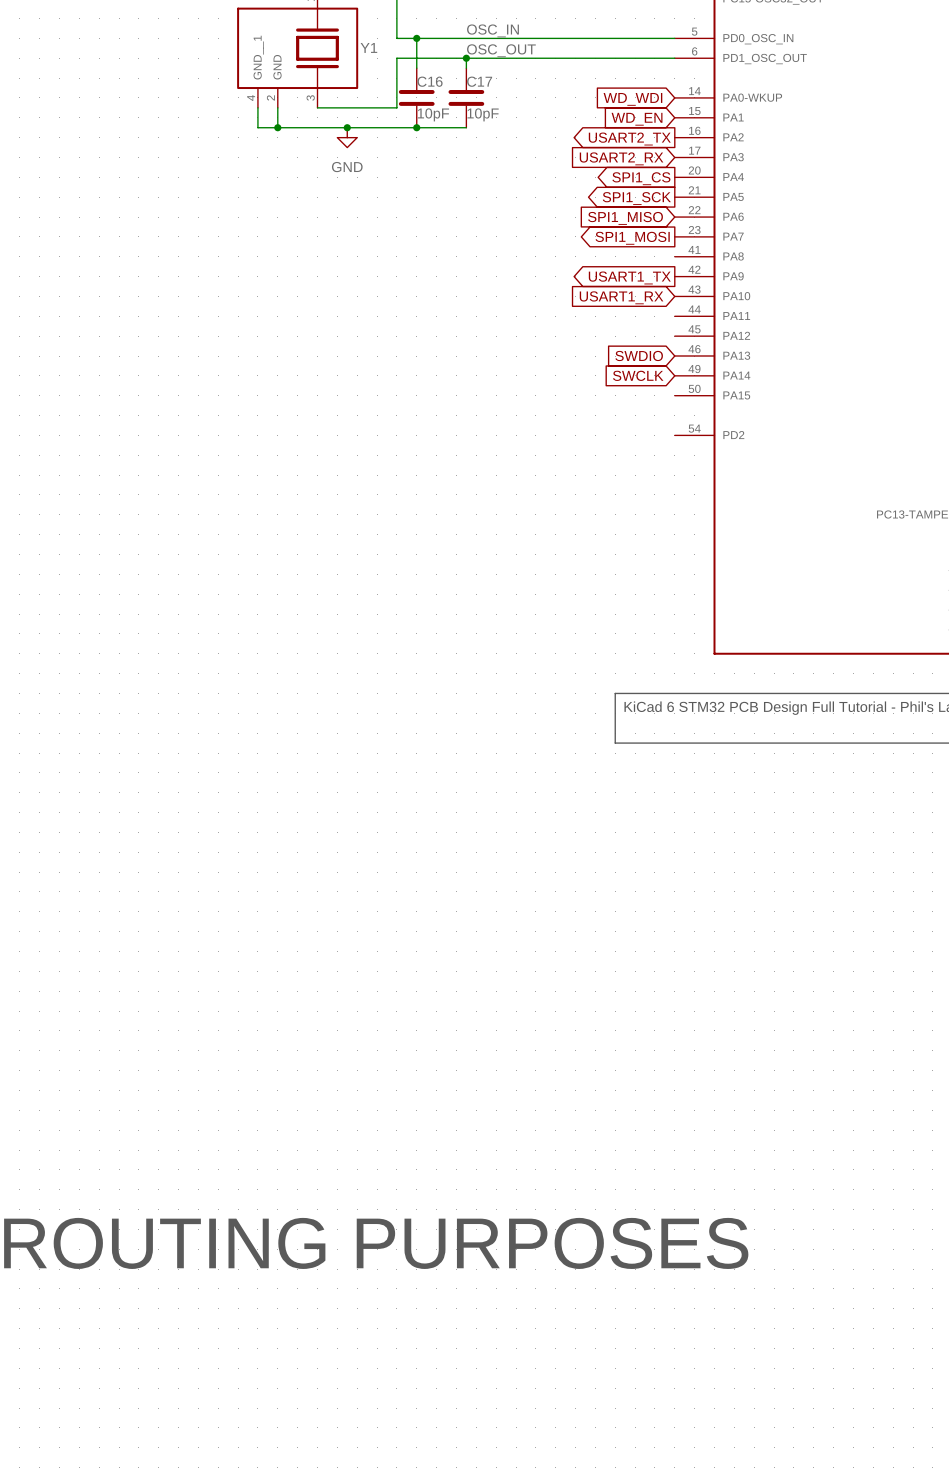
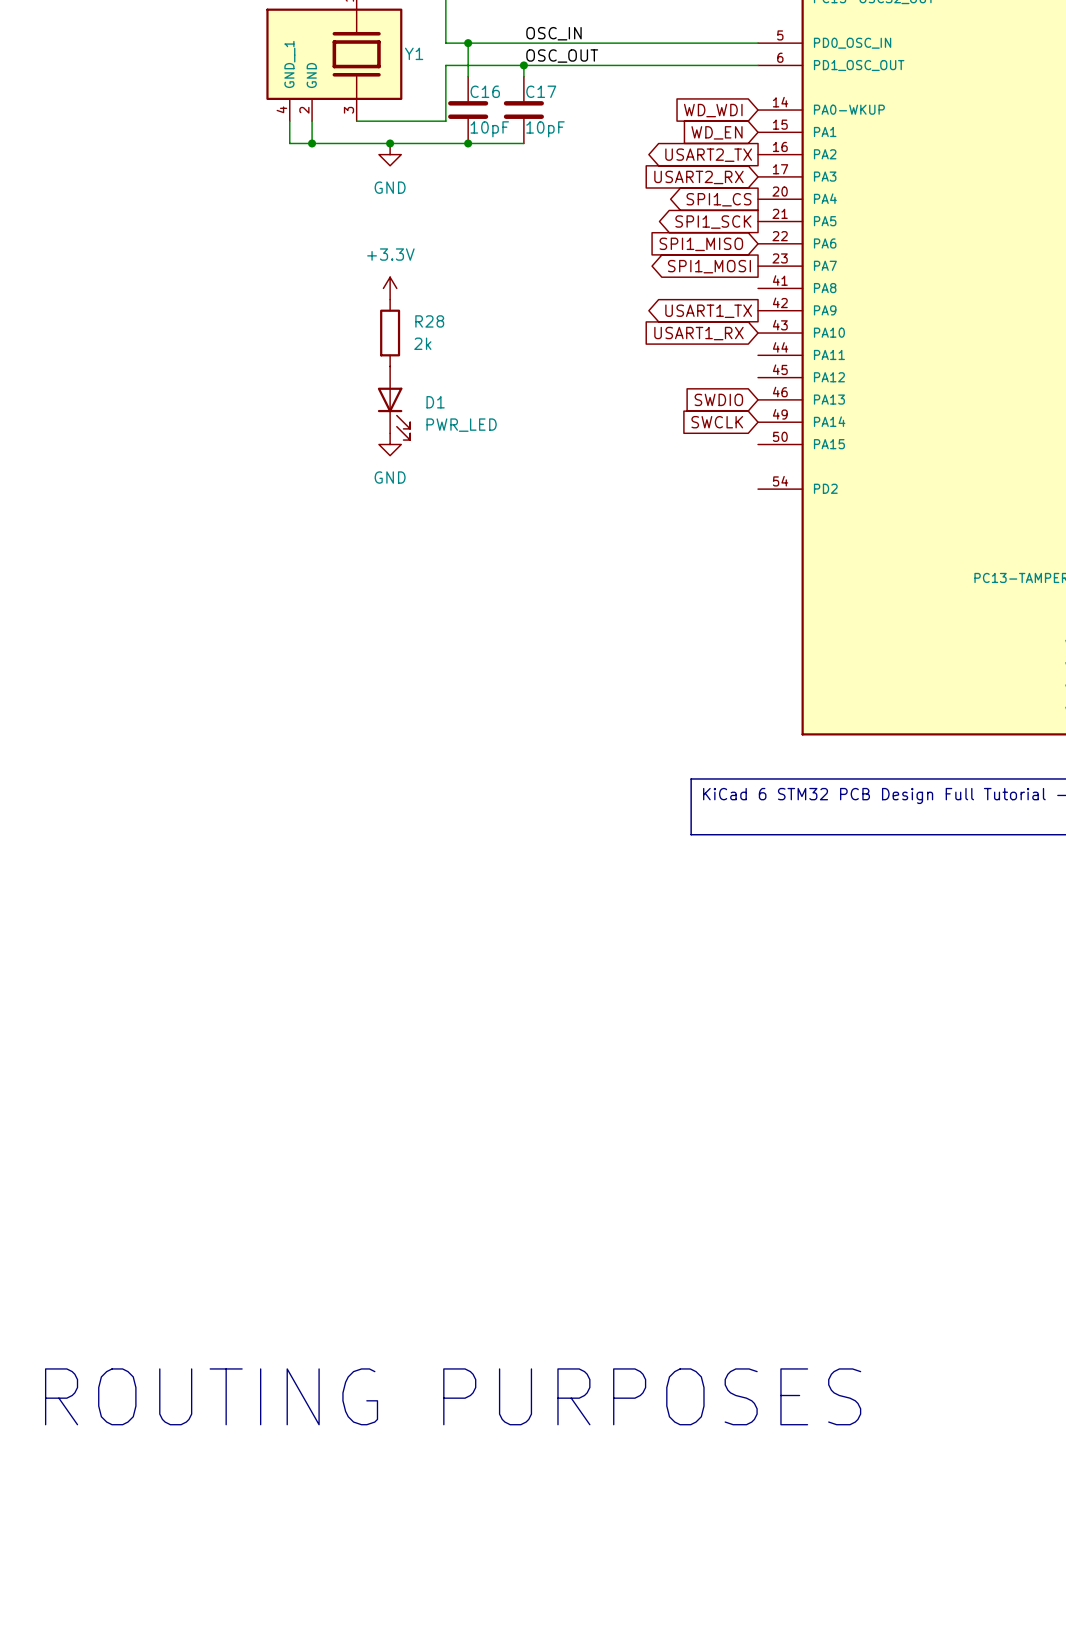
power symbol: none -> +3.3V (390, 288)
R28: none -> 2k (390, 333)
D1: none -> PWR_LED (394, 403)
power symbol: none -> GND (390, 444)

